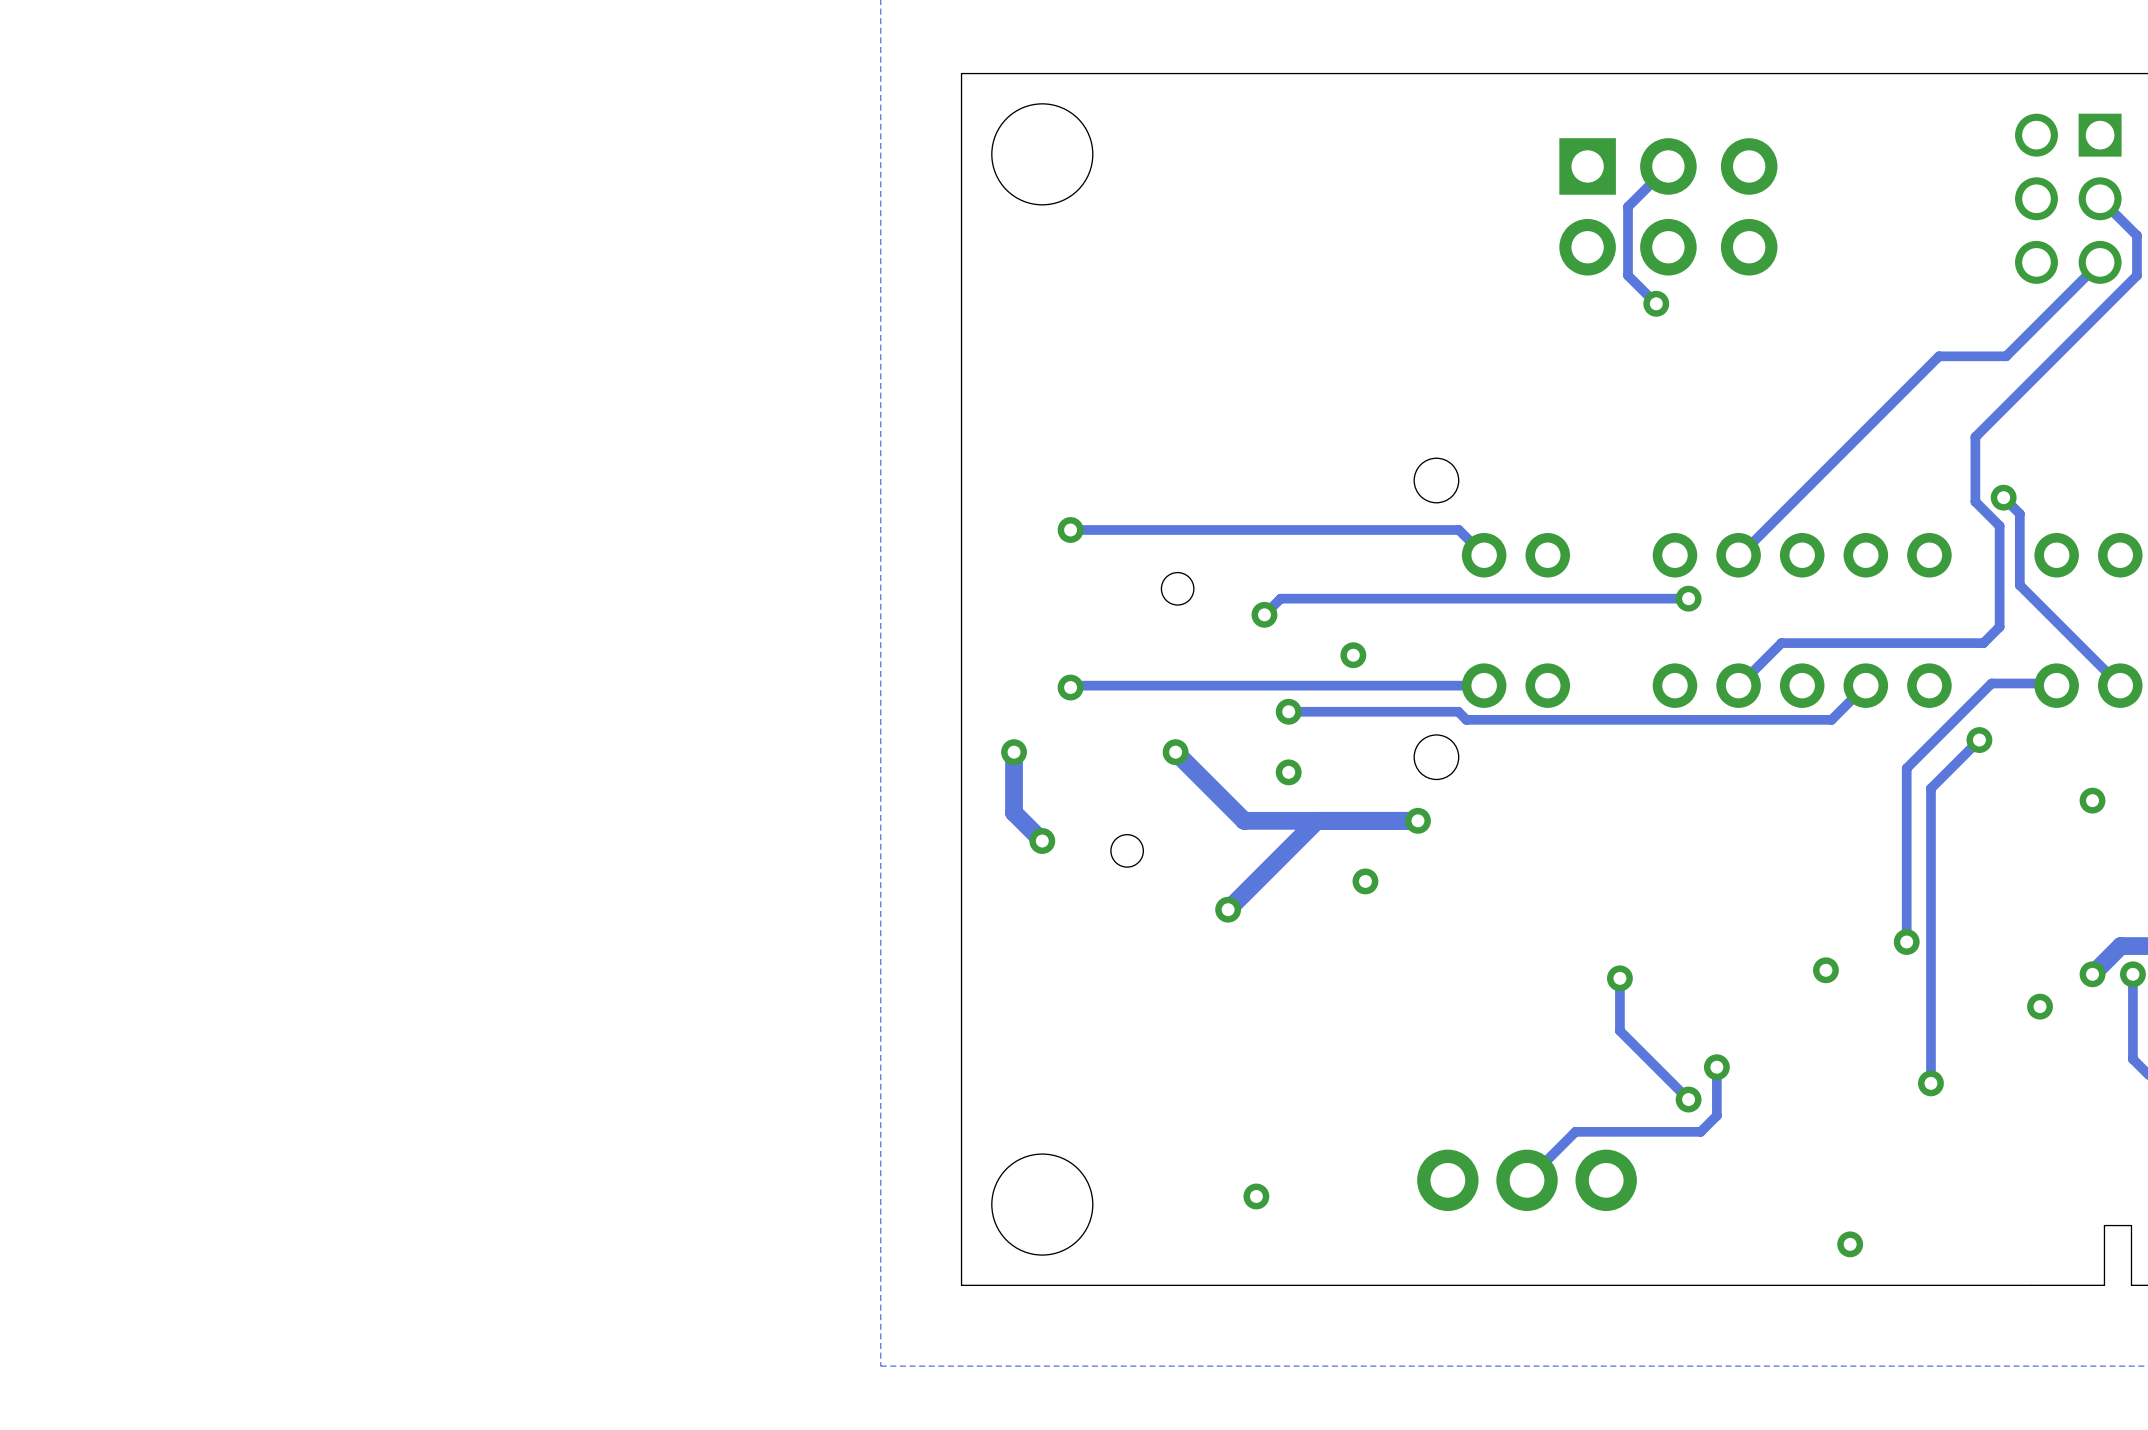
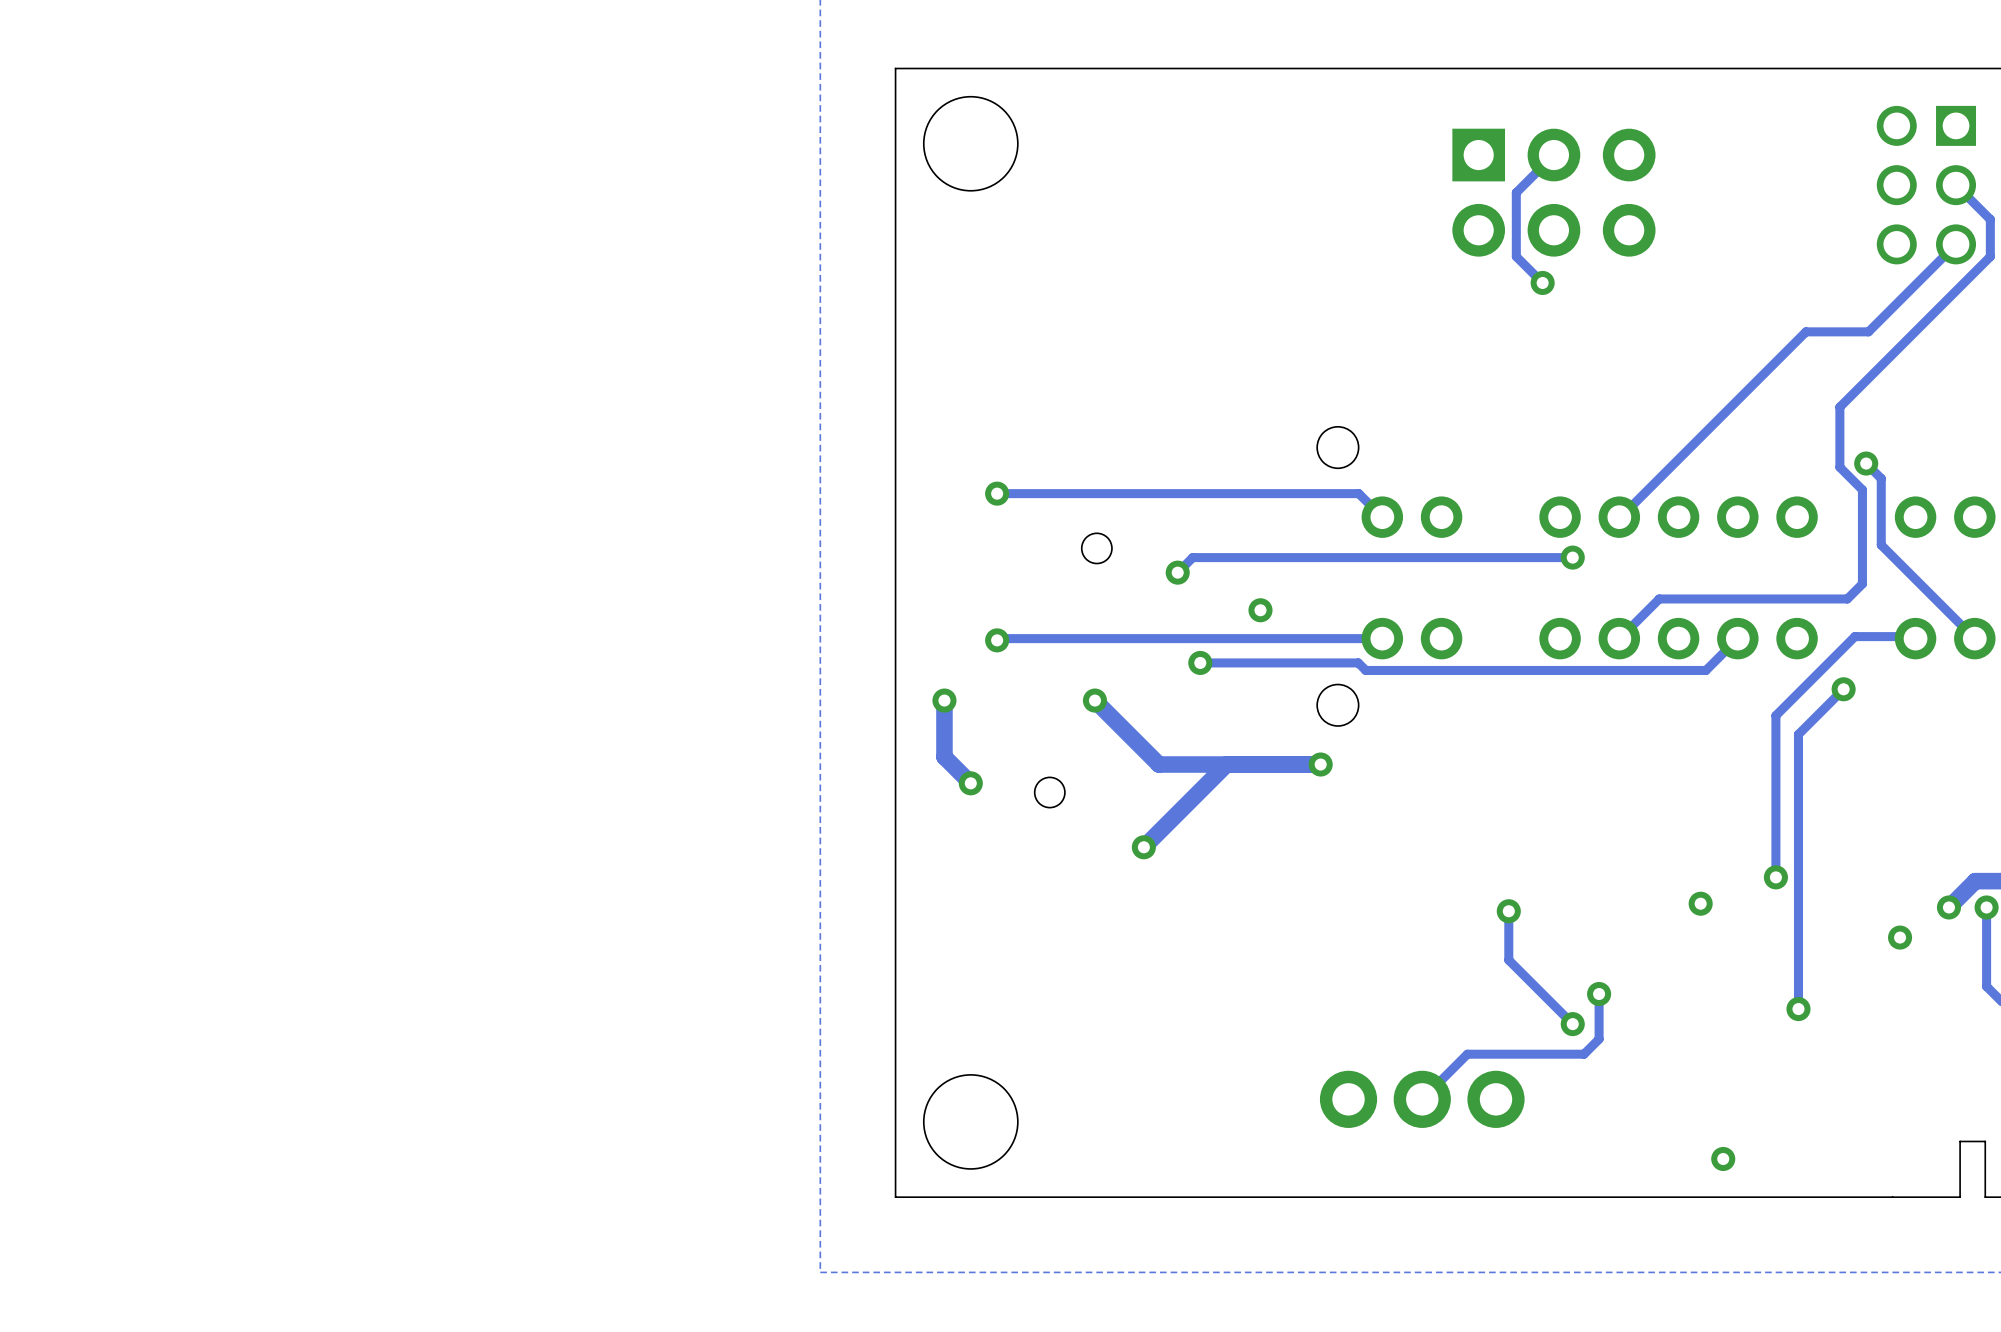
via: (1288, 772) -> none
via: (2092, 800) -> none
via: (1365, 881) -> none
via: (1256, 1196) -> none

